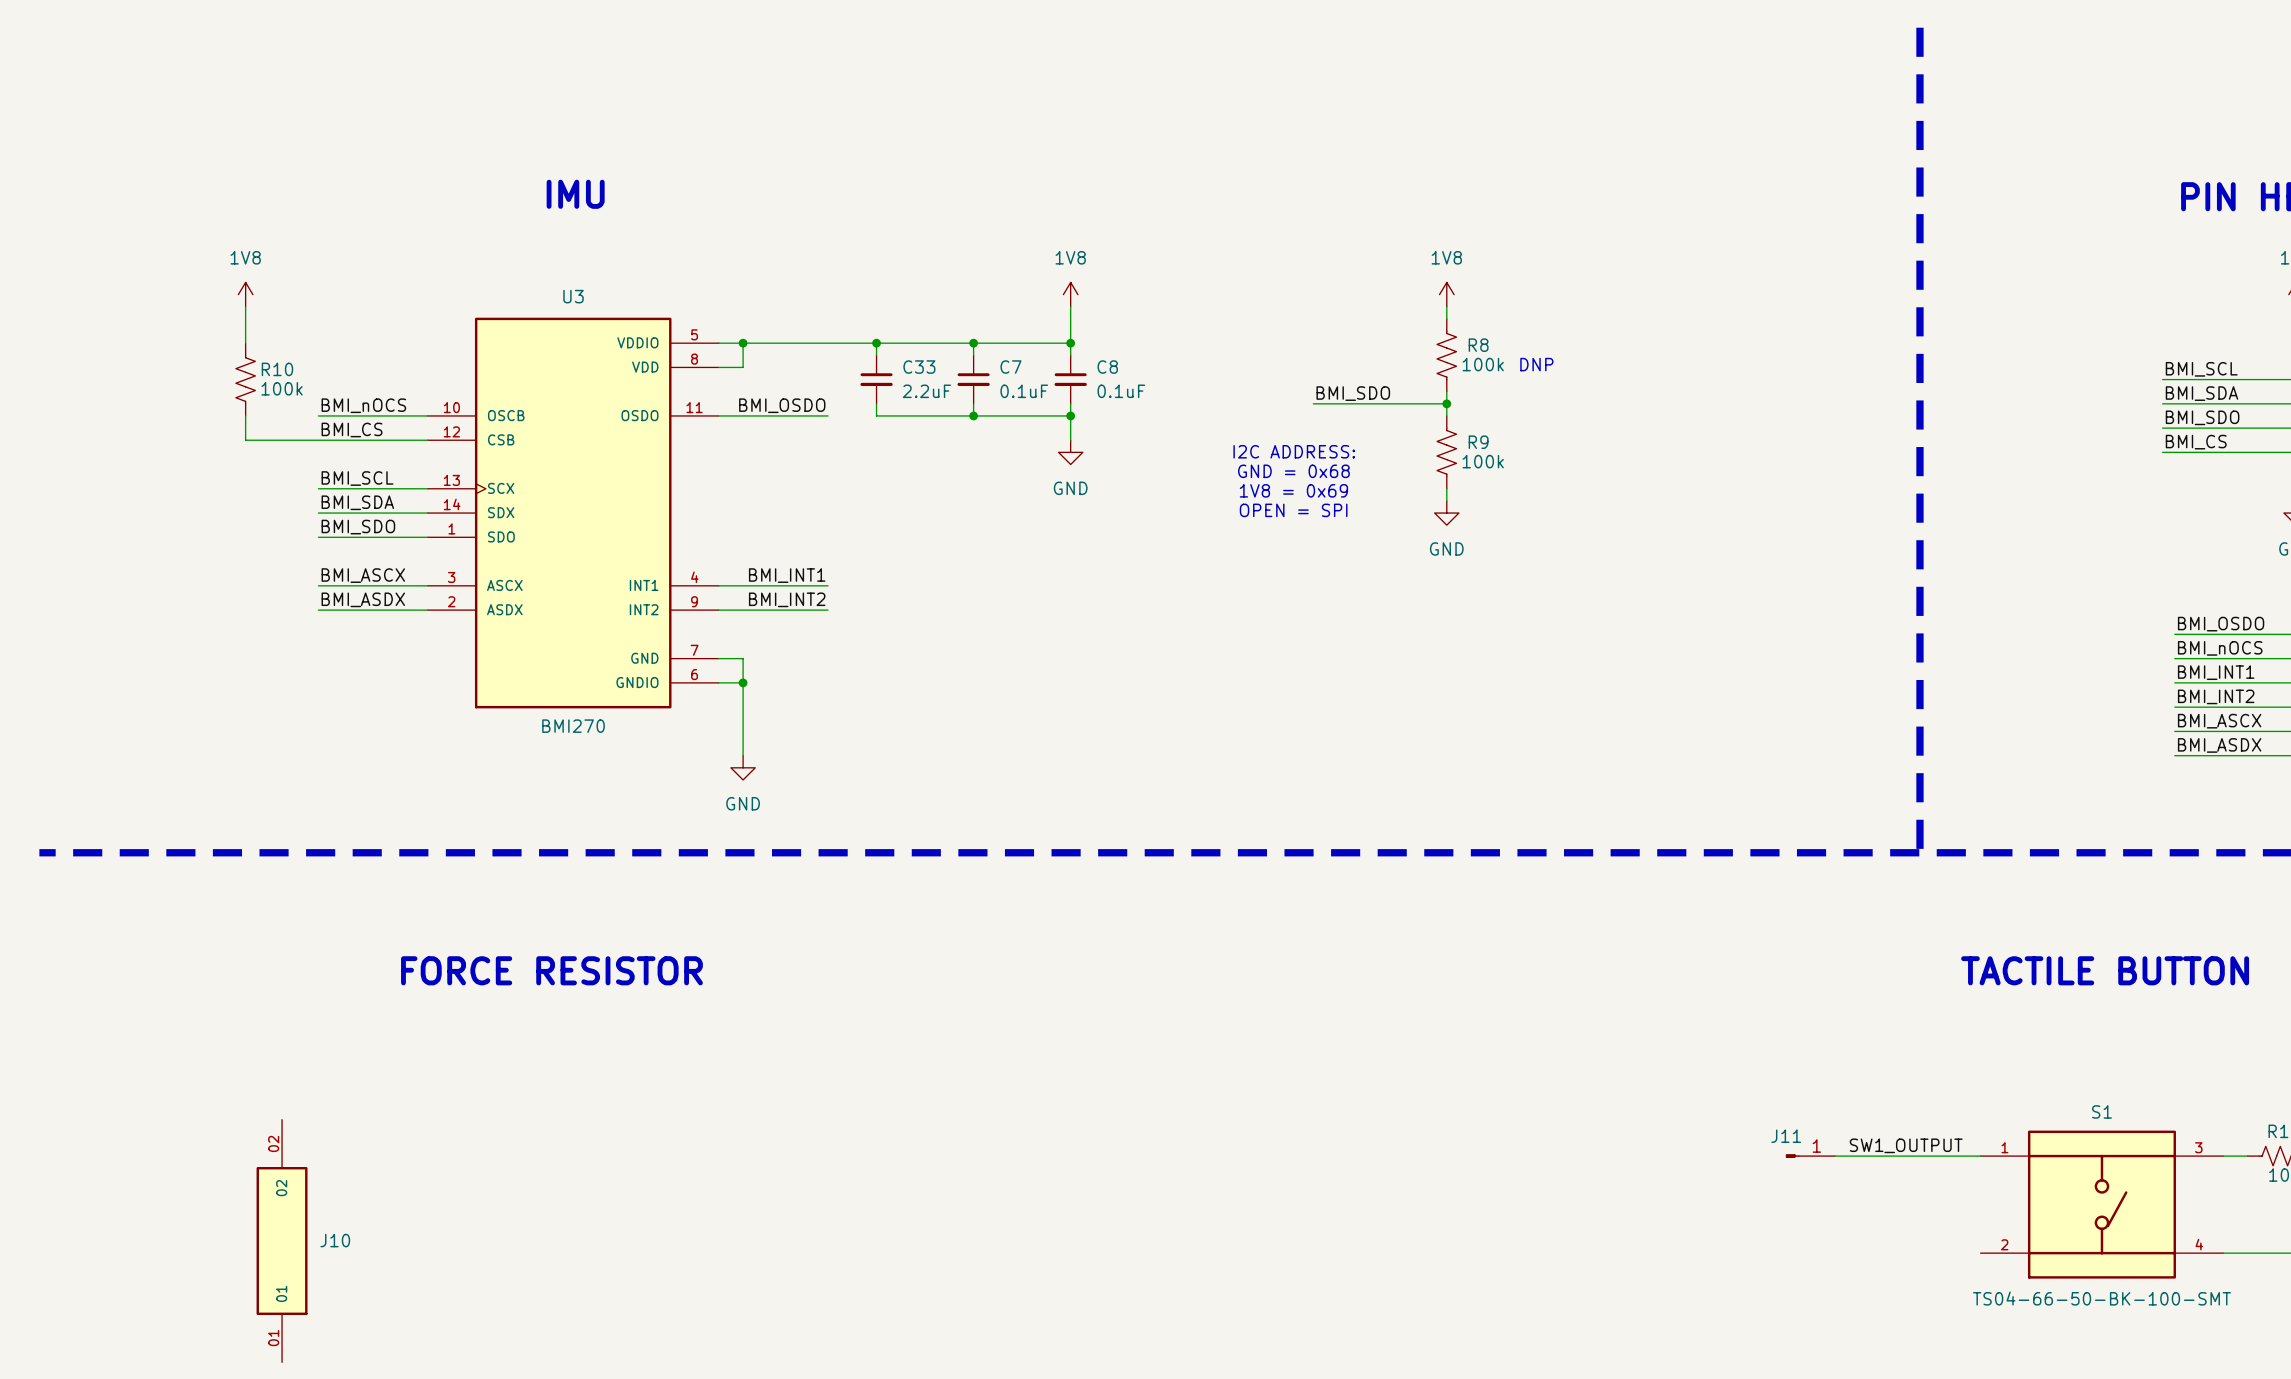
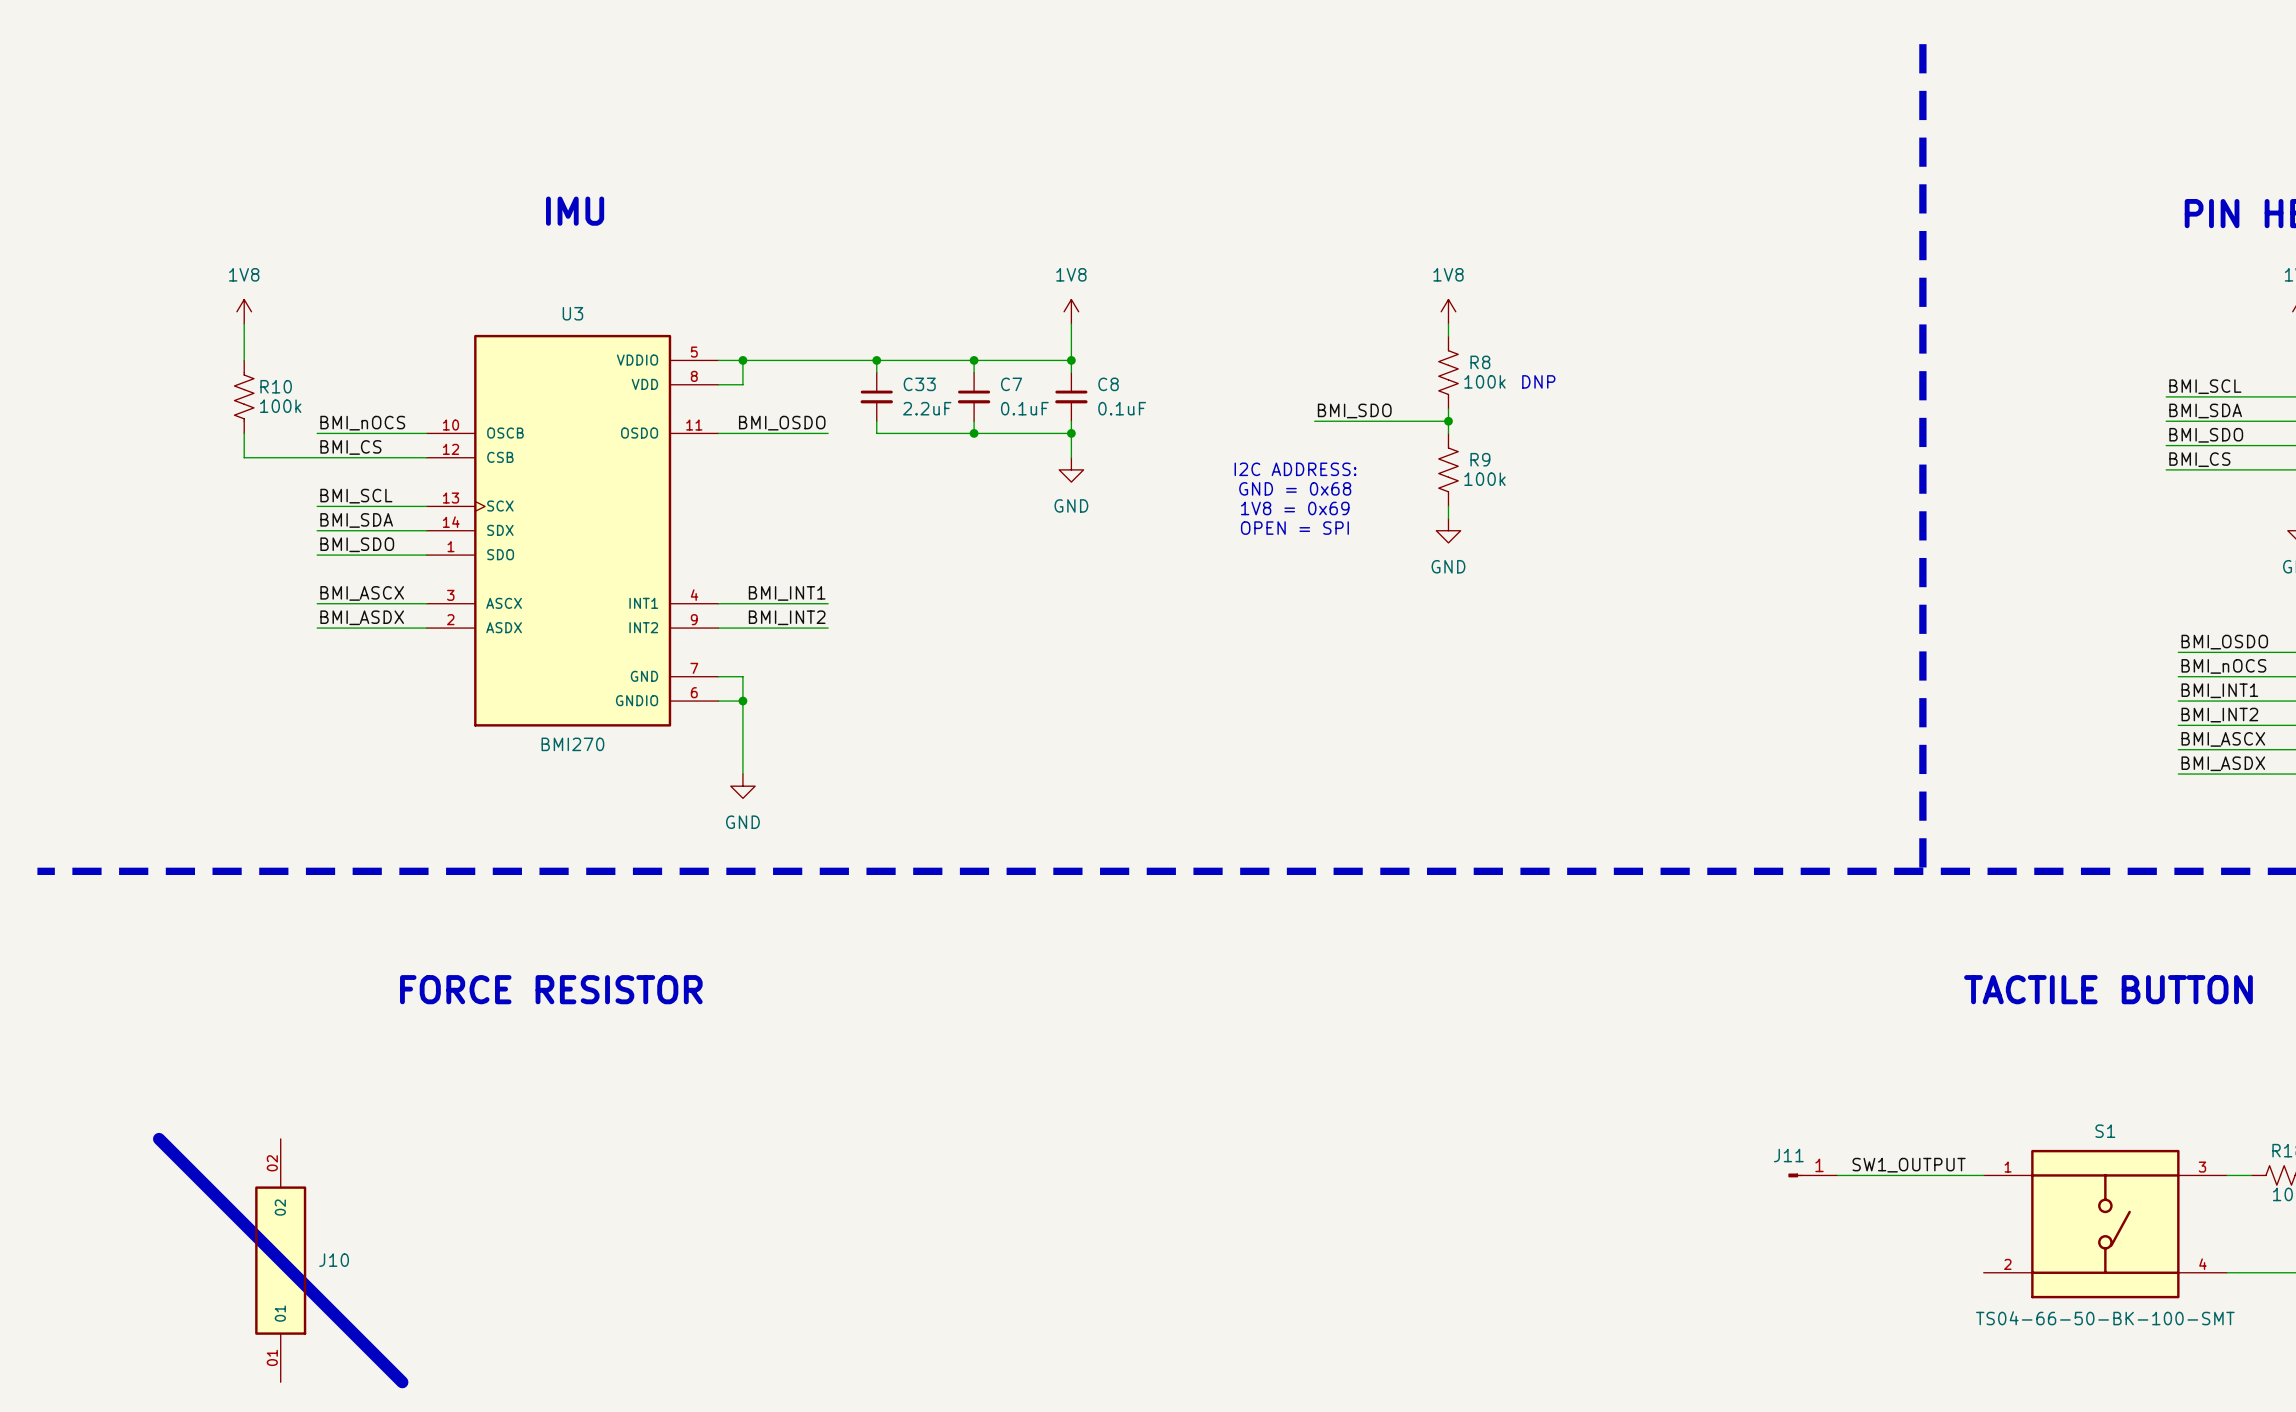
line: none -> (159, 1138) (402, 1382)

